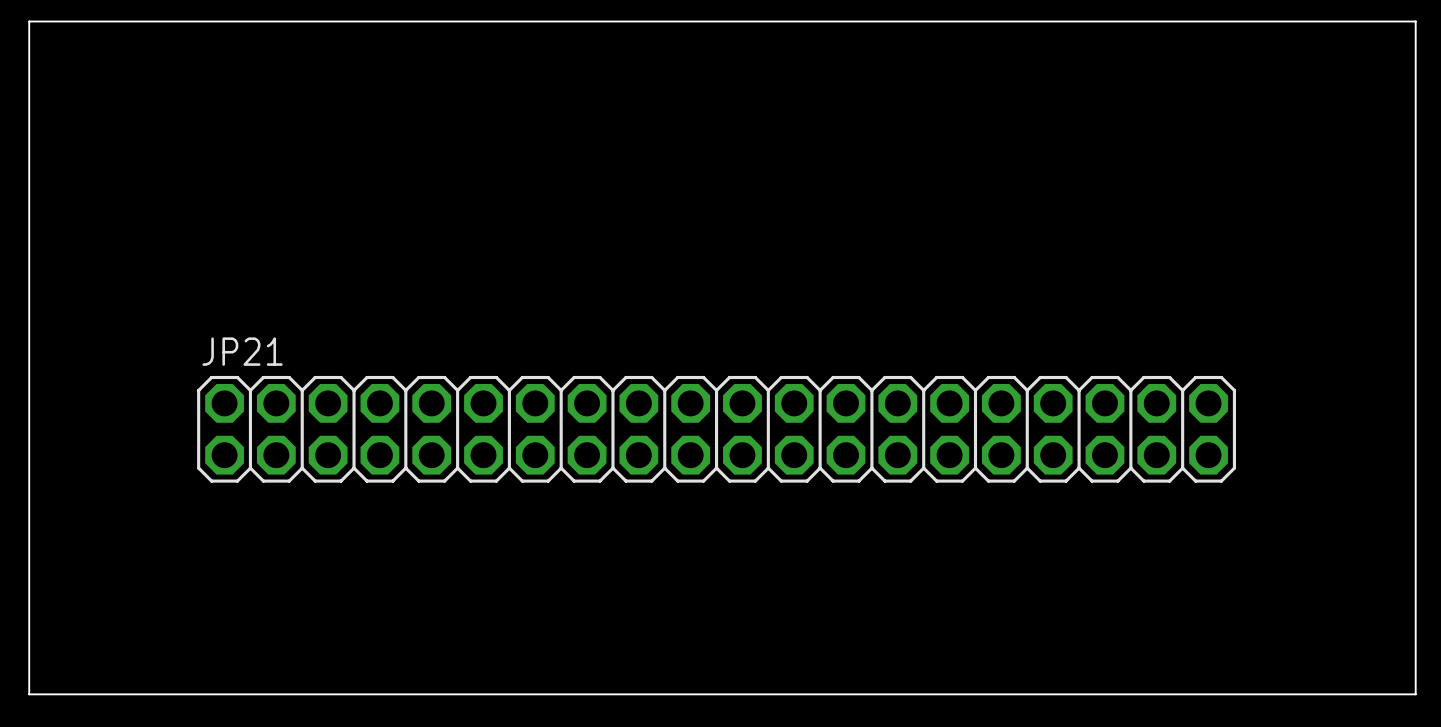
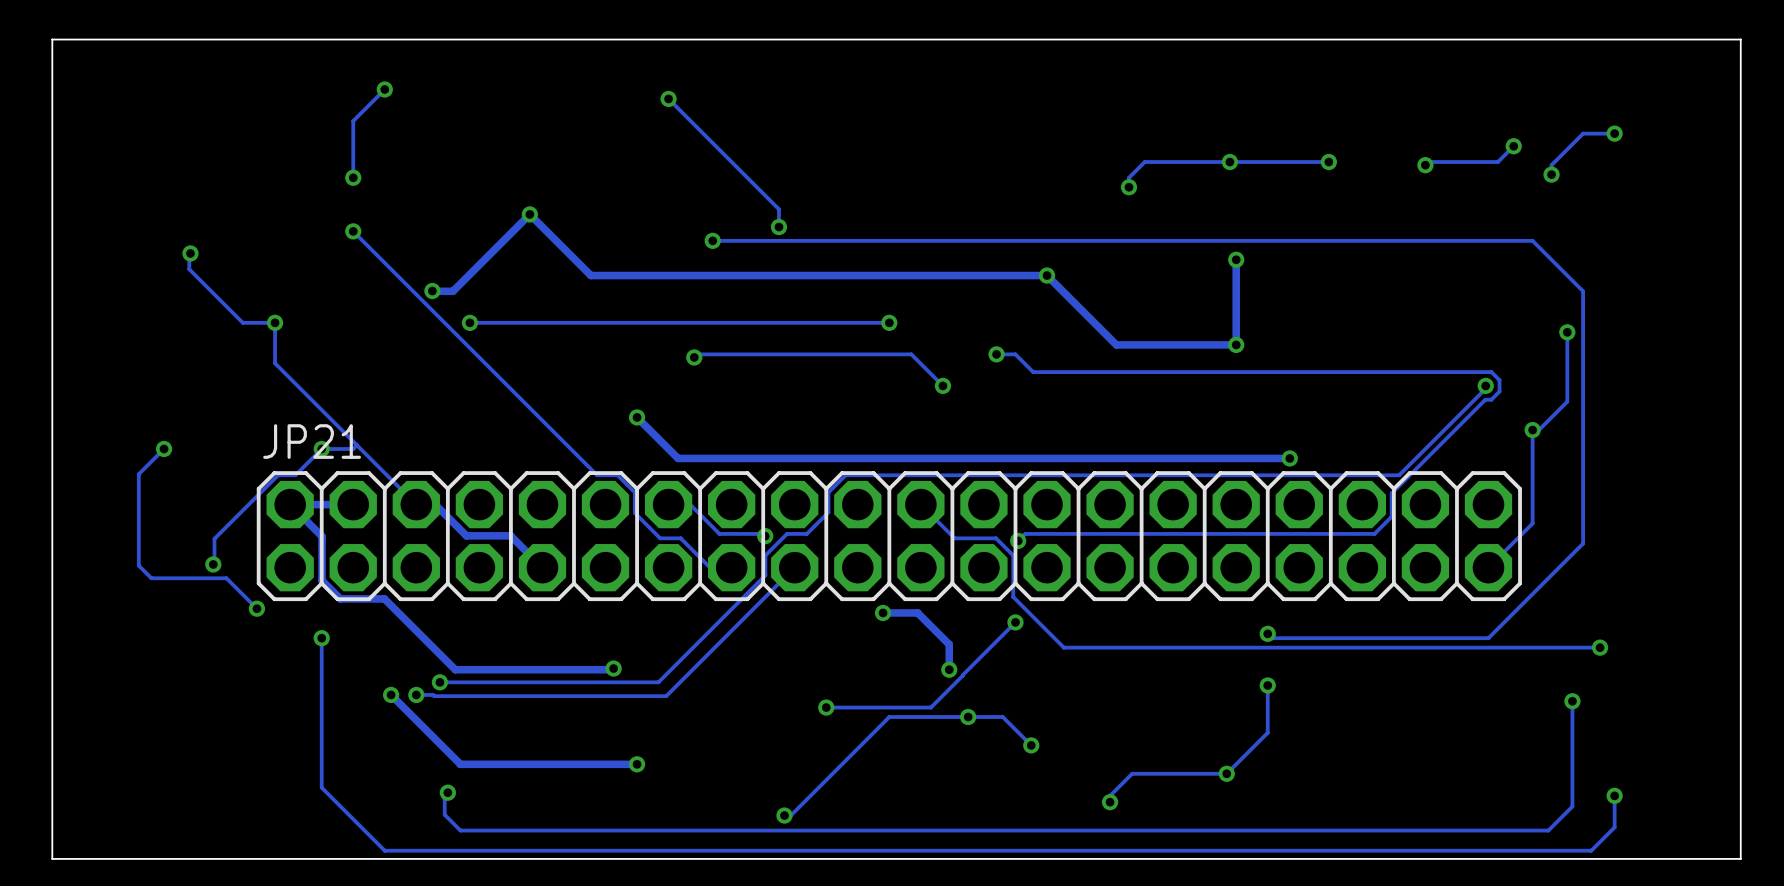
track: none -> (384, 89) (353, 121) (353, 177)
via: none -> (384, 89)
track: none -> (668, 98) (778, 209) (778, 227)
via: none -> (668, 98)
track: none -> (1614, 133) (1583, 133) (1551, 165) (1551, 174)
via: none -> (1614, 133)
track: none -> (1513, 146) (1497, 162) (1425, 162) (1425, 165)
via: none -> (1513, 146)
via: none -> (1229, 162)
track: none -> (1328, 162) (1144, 162) (1129, 177) (1129, 187)
via: none -> (1328, 162)
via: none -> (1425, 165)
via: none -> (1551, 174)
via: none -> (353, 177)
via: none -> (1129, 187)
via: none -> (529, 214)
via: none -> (778, 227)
track: none -> (353, 231) (597, 475) (617, 475) (634, 492) (634, 513) (660, 538) (680, 538) (710, 567) (731, 567)
via: none -> (353, 231)
track: none -> (712, 240) (1532, 240) (1583, 291) (1583, 543) (1488, 638) (1267, 638) (1267, 633)
via: none -> (712, 240)
track: none -> (190, 253) (189, 269) (242, 322) (275, 322) (275, 363) (416, 504) (435, 504) (466, 535) (510, 535) (542, 567)
via: none -> (190, 253)
track: none -> (1236, 259) (1236, 344) (1116, 344) (1047, 275) (590, 275) (529, 214) (452, 291) (432, 291)
via: none -> (1236, 259)
via: none -> (1047, 275)
via: none -> (432, 291)
via: none -> (275, 322)
via: none -> (469, 322)
track: none -> (889, 322) (469, 322)
via: none -> (889, 322)
track: none -> (1567, 332) (1567, 401) (1538, 430) (1532, 430) (1532, 523) (1488, 567)
via: none -> (1567, 332)
via: none -> (1236, 344)
track: none -> (996, 354) (1015, 354) (1033, 372) (1491, 372) (1499, 380) (1499, 391) (1491, 399) (1485, 399) (1391, 493) (1391, 516) (1374, 533) (1025, 533) (1018, 540)
via: none -> (996, 354)
track: none -> (694, 357) (697, 354) (911, 354) (942, 385)
via: none -> (694, 357)
via: none -> (942, 385)
track: none -> (1485, 385) (1488, 385) (1399, 475) (845, 475) (828, 492) (828, 512) (806, 533) (787, 533) (765, 555) (765, 575) (658, 682) (439, 682)
via: none -> (1485, 385)
track: none -> (637, 417) (678, 458) (1289, 458)
via: none -> (637, 417)
via: none -> (1532, 430)
track: none -> (356, 445) (353, 448) (321, 448) (295, 475) (278, 475) (214, 538) (213, 564)
track: none -> (164, 448) (138, 474) (138, 565) (151, 578) (226, 578) (256, 608)
via: none -> (164, 448)
via: none -> (321, 448)
via: none -> (1289, 458)
track: none -> (353, 504) (290, 504) (322, 536) (322, 580) (340, 598) (384, 598) (455, 669) (613, 668)
track: none -> (668, 504) (690, 504) (719, 533) (763, 533) (765, 536)
track: none -> (920, 504) (954, 538) (996, 538) (1013, 555) (1013, 597) (1063, 647) (1600, 647)
via: none -> (765, 536)
via: none -> (1018, 540)
via: none -> (213, 564)
track: none -> (794, 567) (666, 696) (416, 694)
via: none -> (256, 608)
track: none -> (883, 612) (917, 612) (949, 644) (949, 669)
via: none -> (883, 612)
track: none -> (1015, 622) (930, 707) (826, 707)
via: none -> (1015, 622)
via: none -> (1267, 633)
track: none -> (321, 638) (321, 787) (384, 850) (1591, 850) (1614, 827) (1614, 795)
via: none -> (321, 638)
via: none -> (1600, 647)
via: none -> (613, 668)
via: none -> (949, 669)
via: none -> (439, 682)
track: none -> (1267, 685) (1267, 732) (1226, 773) (1132, 773) (1110, 795) (1110, 802)
via: none -> (1267, 685)
track: none -> (391, 694) (460, 764) (637, 764)
via: none -> (391, 694)
via: none -> (416, 694)
track: none -> (1572, 701) (1572, 806) (1548, 830) (460, 830) (444, 814) (444, 792) (447, 792)
via: none -> (1572, 701)
via: none -> (826, 707)
via: none -> (968, 717)
track: none -> (1031, 745) (1002, 717) (889, 717) (790, 815) (784, 815)
via: none -> (1031, 745)
via: none -> (637, 764)
via: none -> (1226, 773)
via: none -> (447, 792)
via: none -> (1614, 795)
via: none -> (1110, 802)
via: none -> (784, 815)

